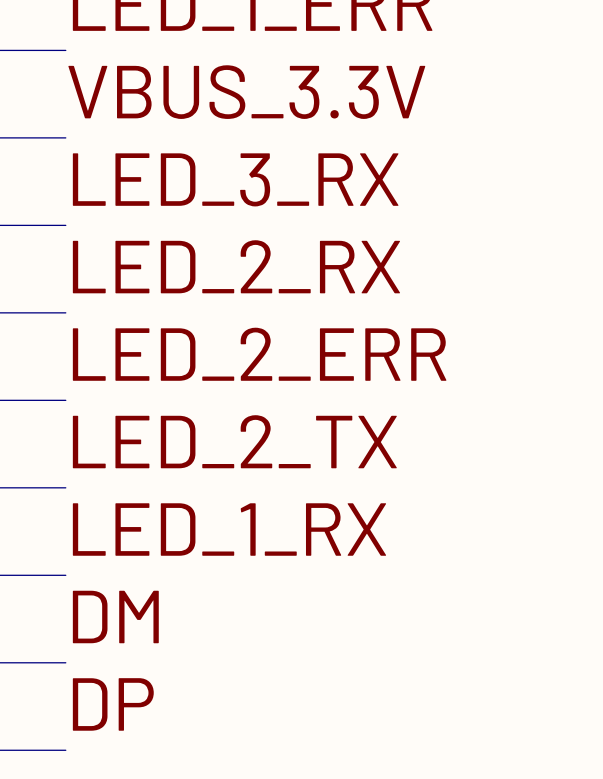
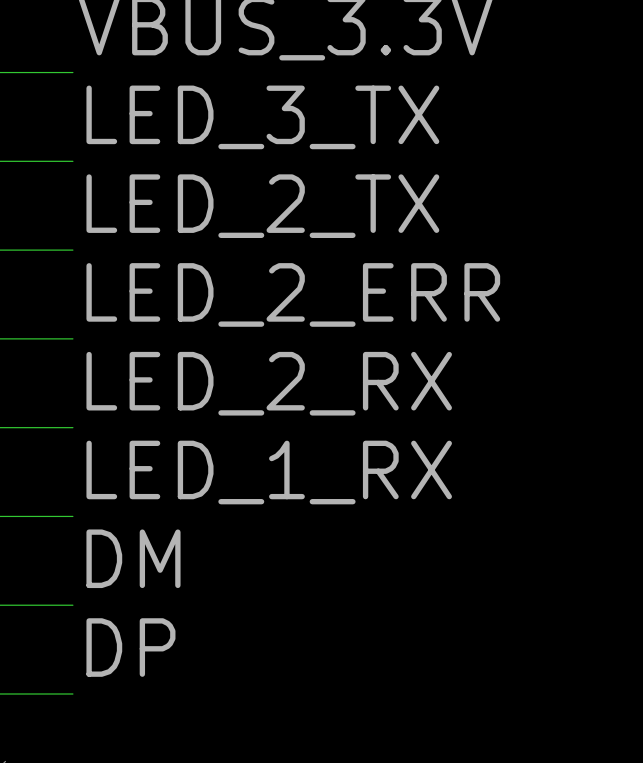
label: LED_3_RX (235, 179) -> LED_3_TX (262, 117)
label: LED_2_RX (236, 266) -> LED_2_TX (262, 206)
label: LED_2_TX (234, 441) -> LED_2_RX (269, 383)

